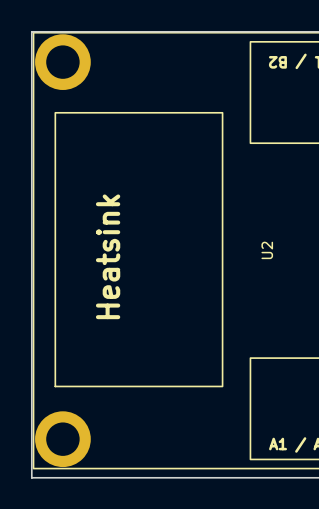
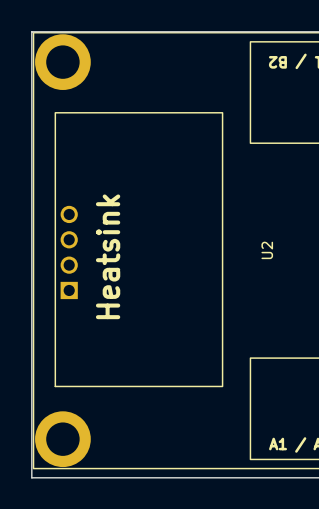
part: none -> (69, 252)

